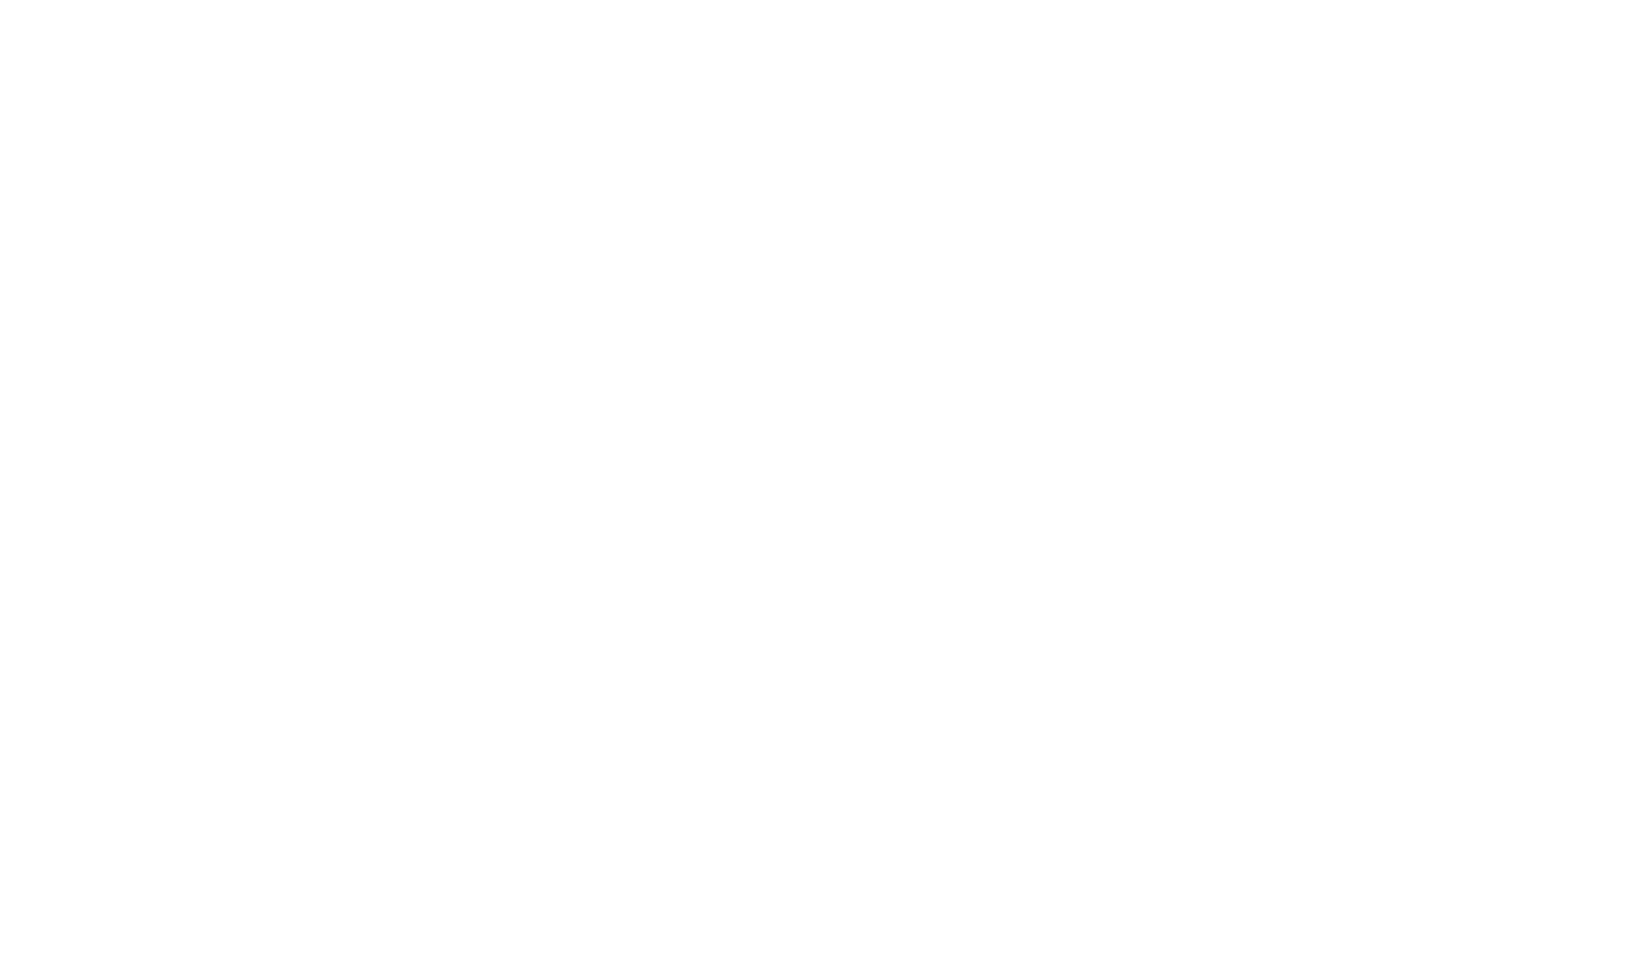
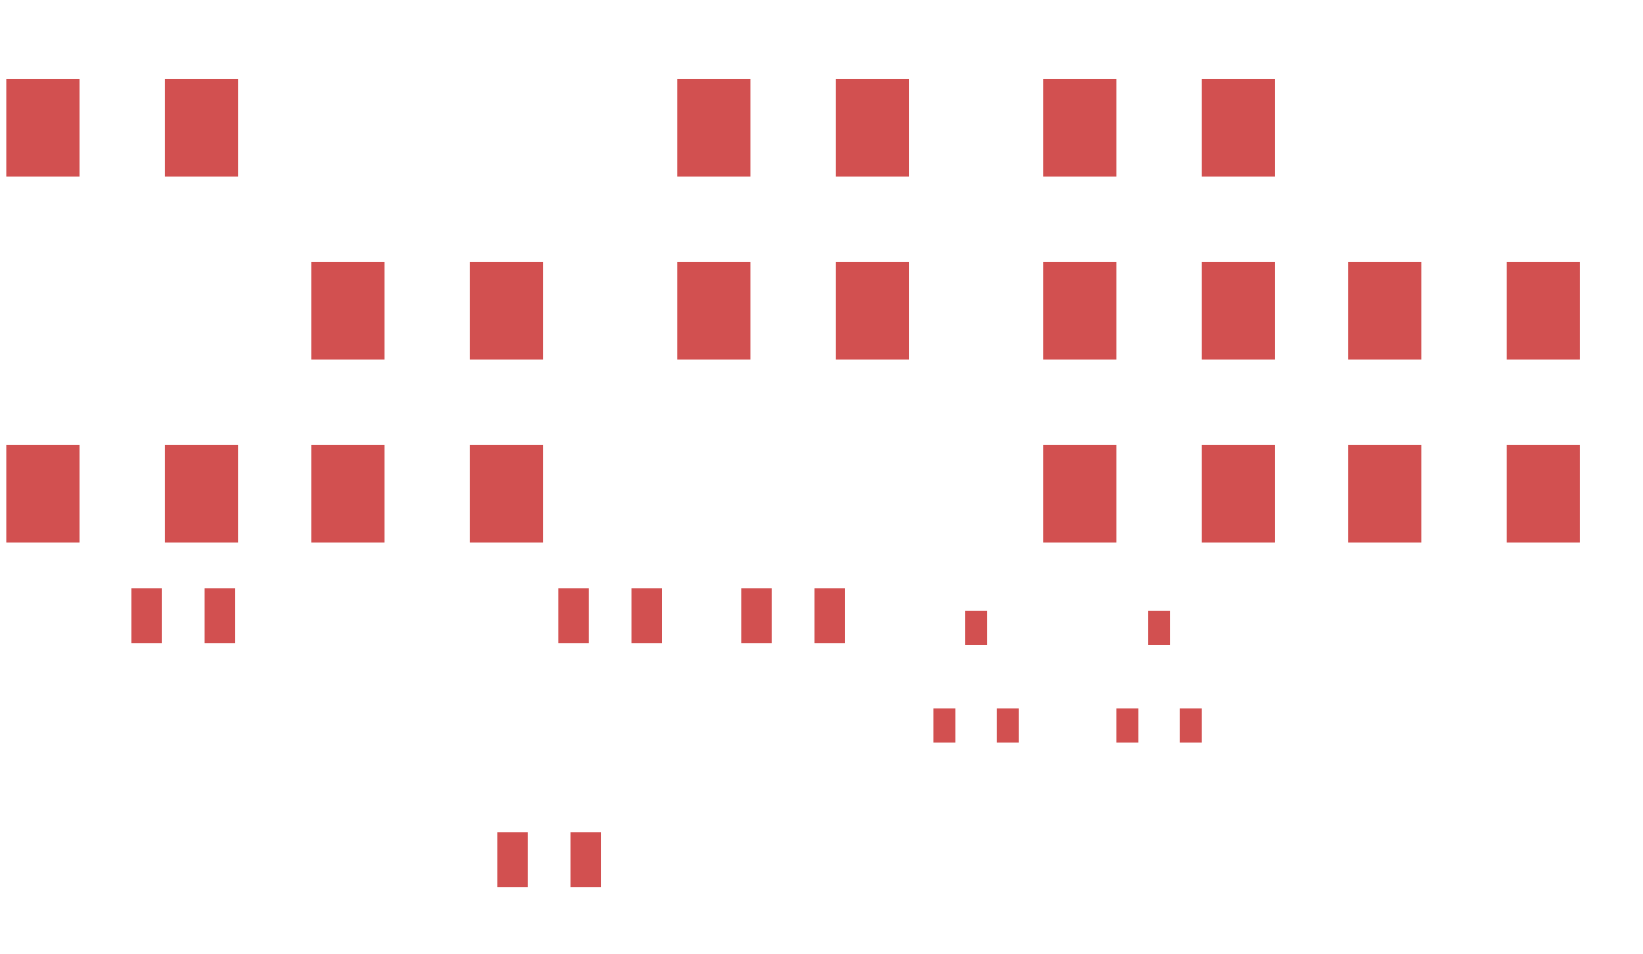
part: none -> (122, 127)
part: none -> (793, 127)
part: none -> (1159, 127)
part: none -> (427, 310)
part: none -> (793, 310)
part: none -> (1159, 310)
part: none -> (1464, 310)
part: none -> (122, 493)
part: none -> (427, 493)
part: none -> (1159, 493)
part: none -> (1464, 493)
part: none -> (183, 615)
part: none -> (610, 615)
part: none -> (793, 615)
part: none -> (976, 676)
part: none -> (1159, 676)
part: none -> (549, 859)

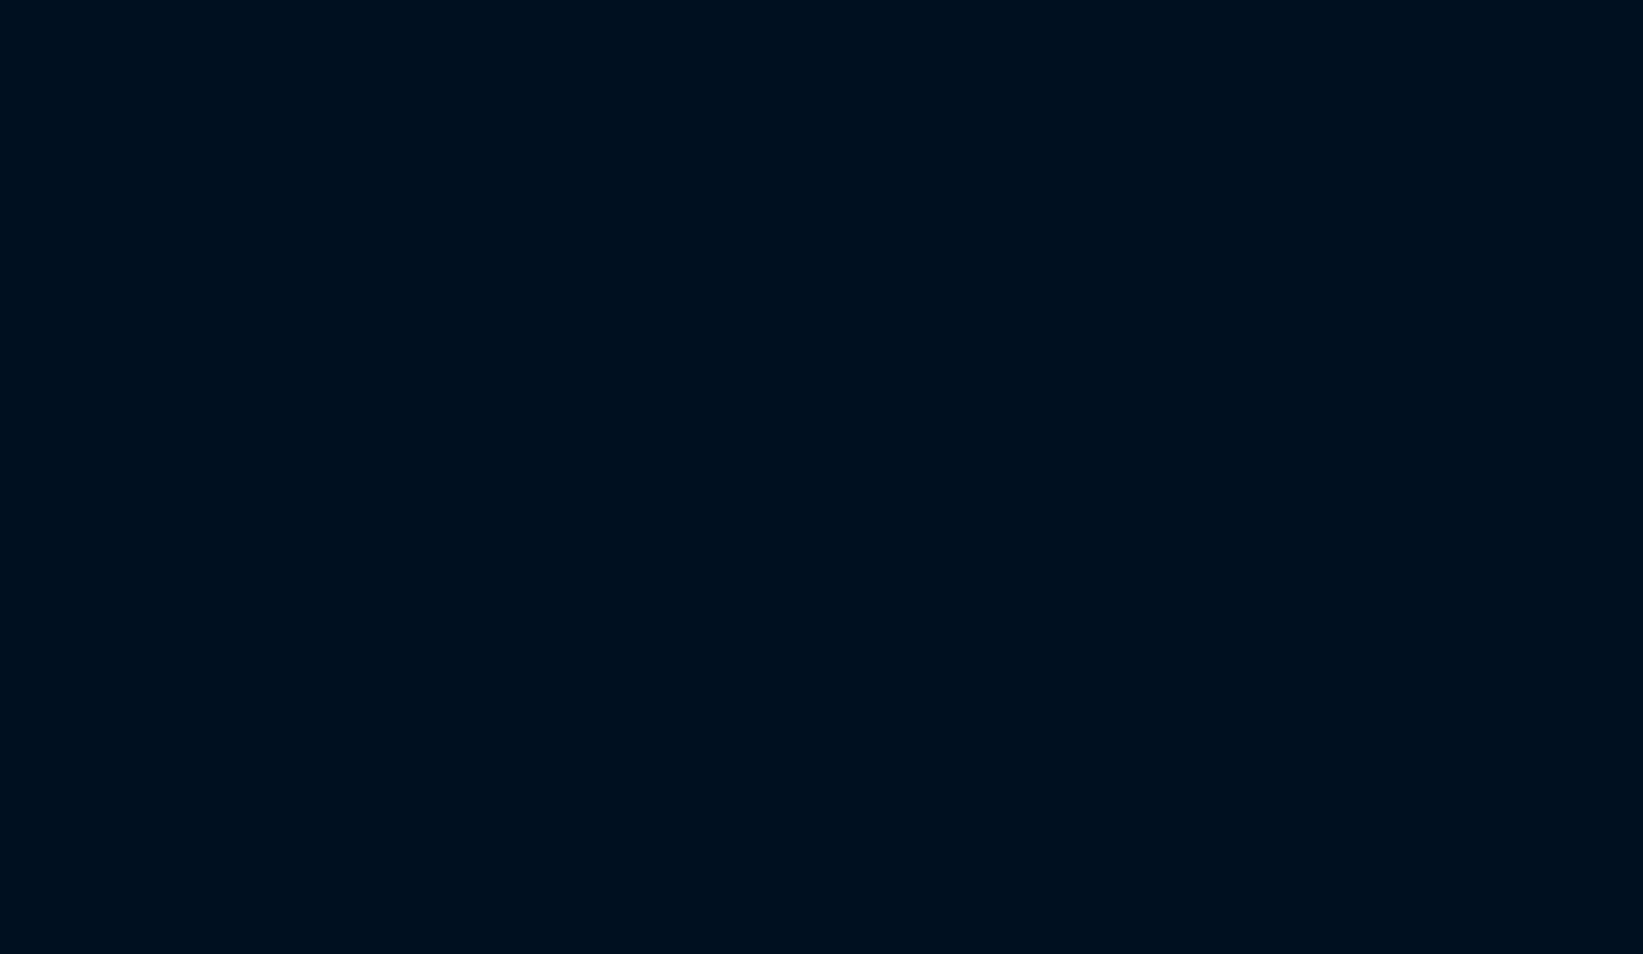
part: (122, 127) -> none
part: (793, 127) -> none
part: (1159, 127) -> none
part: (427, 310) -> none
part: (793, 310) -> none
part: (1159, 310) -> none
part: (1464, 310) -> none
part: (122, 493) -> none
part: (427, 493) -> none
part: (1159, 493) -> none
part: (1464, 493) -> none
part: (183, 615) -> none
part: (610, 615) -> none
part: (793, 615) -> none
part: (976, 676) -> none
part: (1159, 676) -> none
part: (549, 859) -> none

